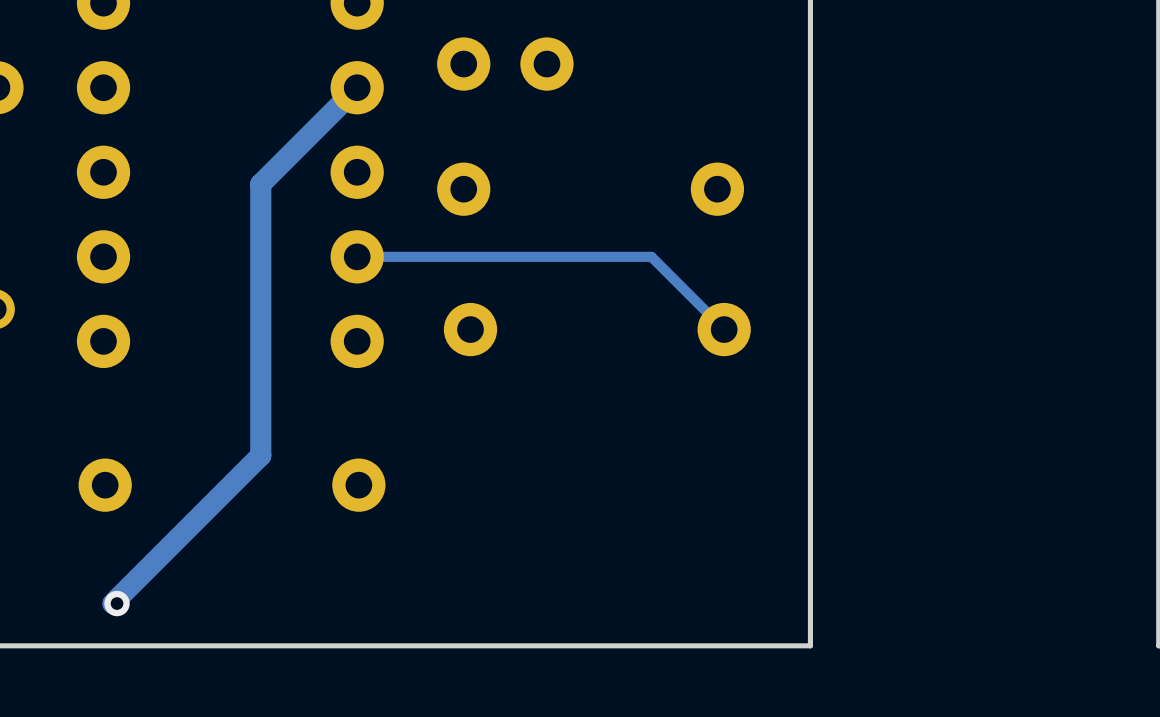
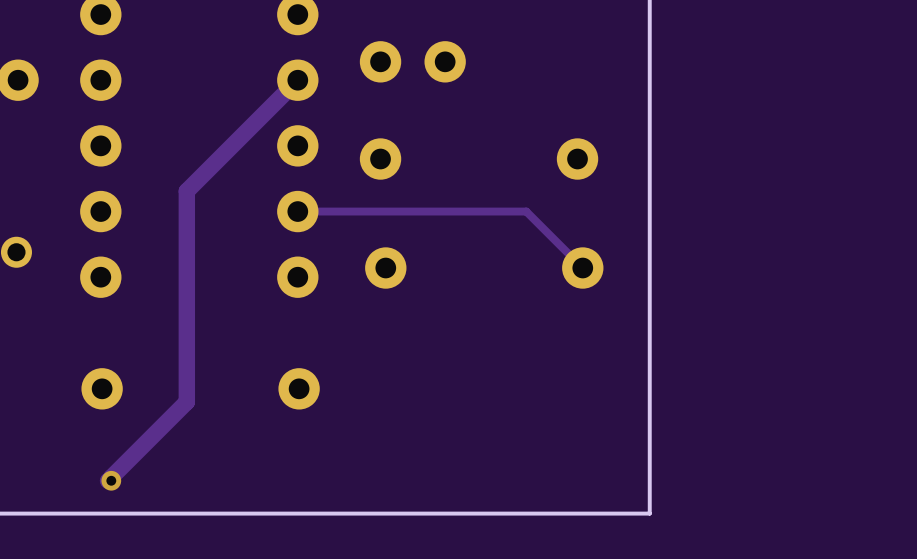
track: (260, 184) (260, 455) (214, 502) -> (222, 155) (186, 191) (186, 401)

